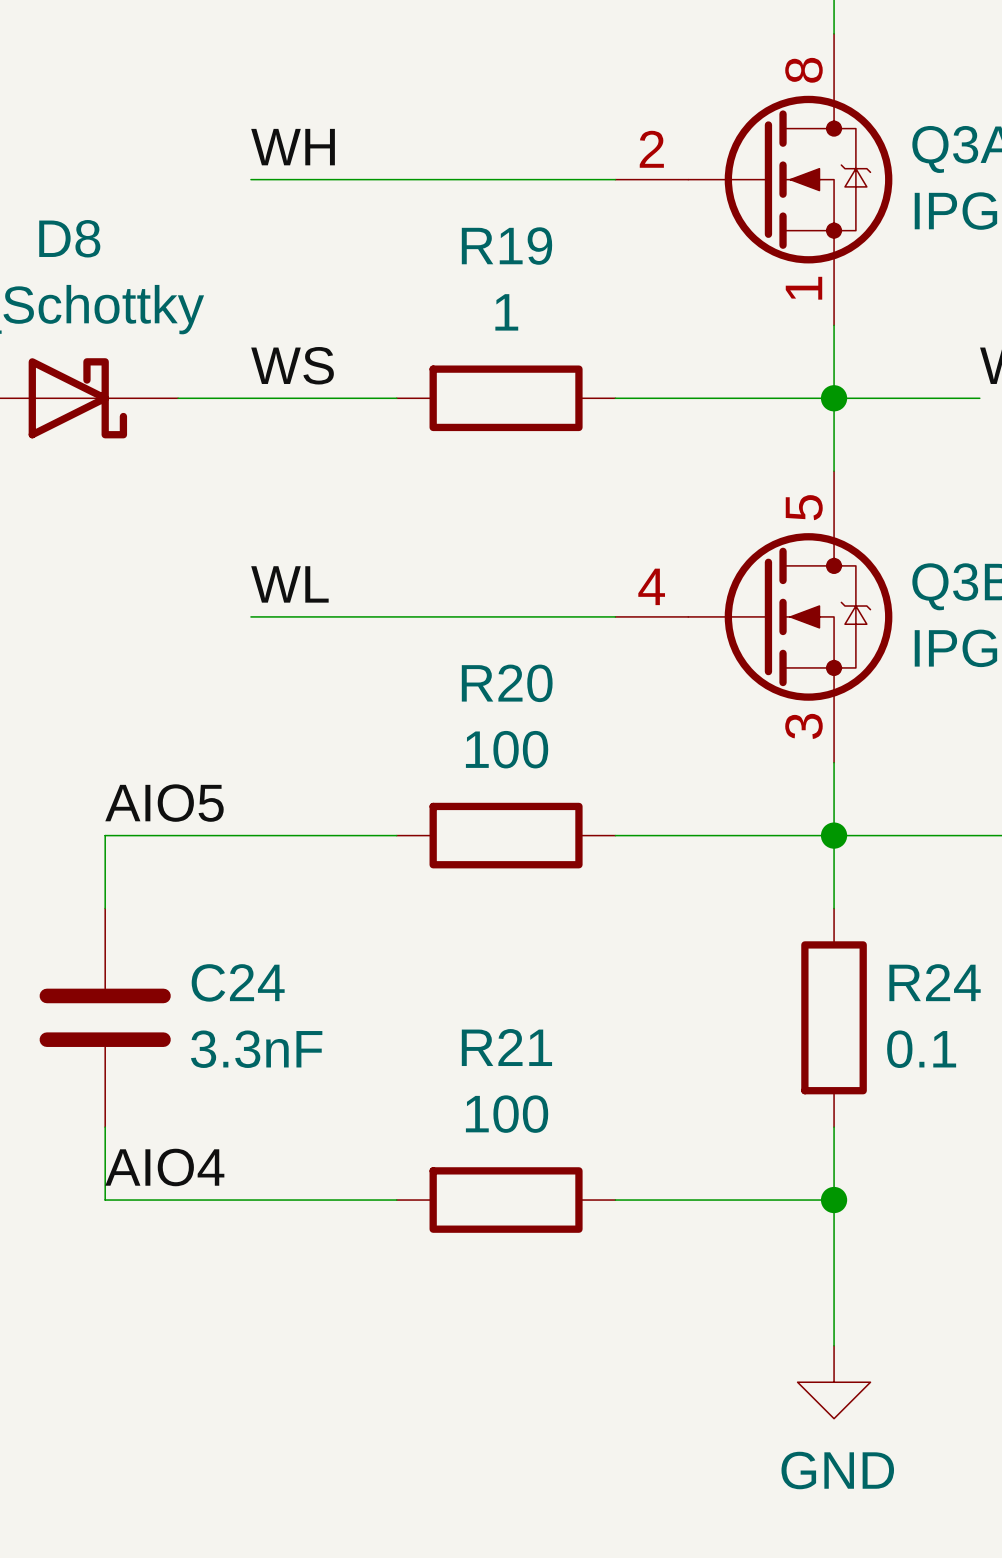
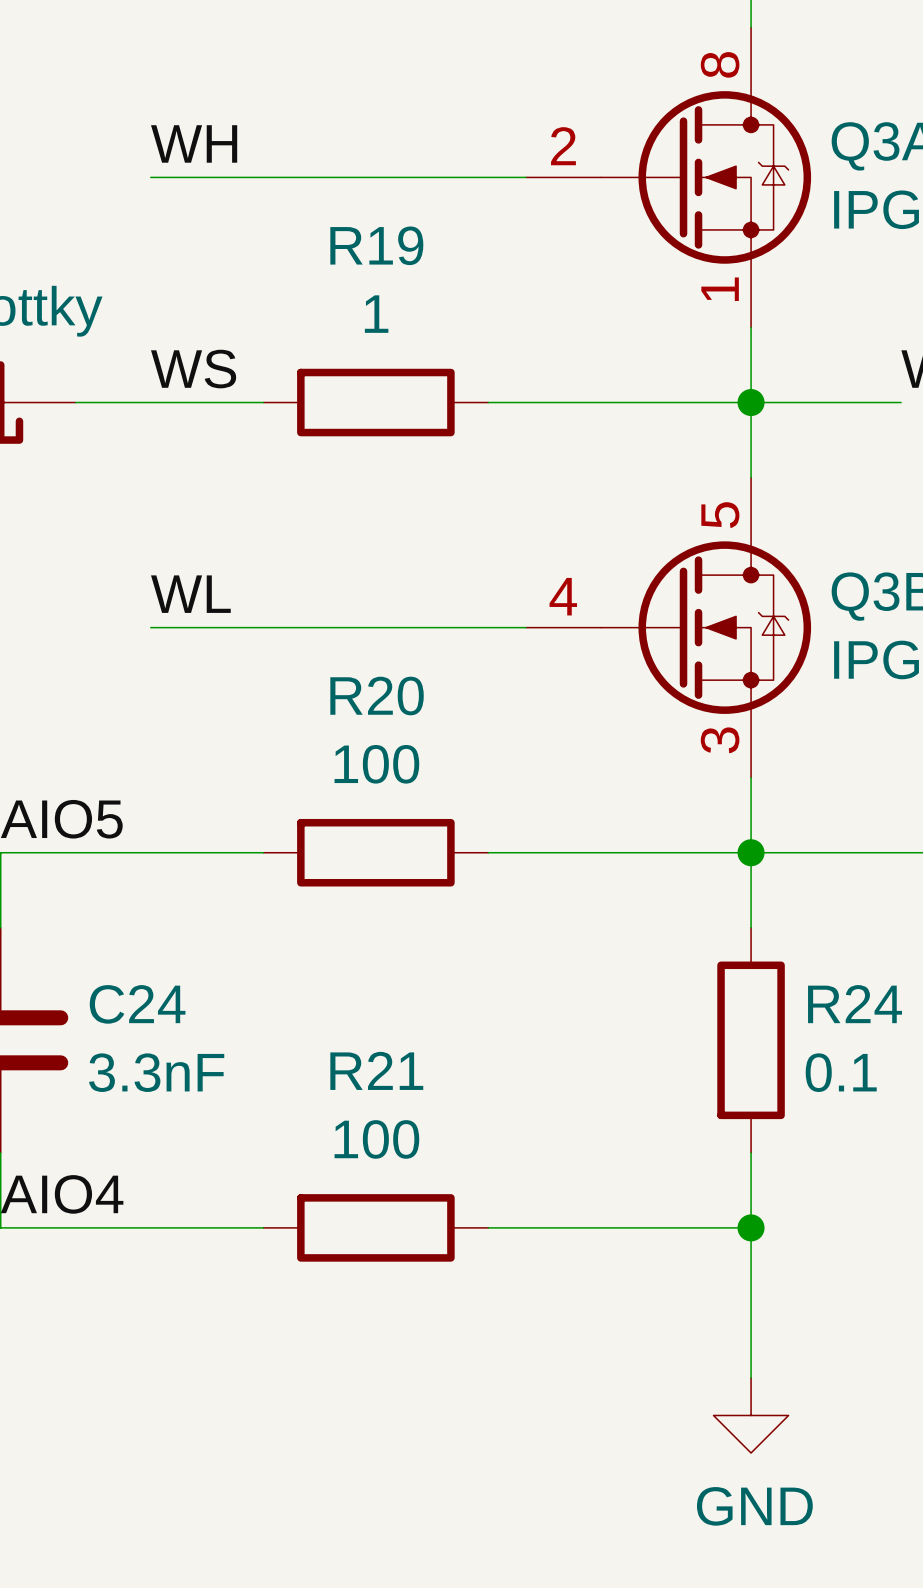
R19 position: (506, 398) -> (375, 402)
R20 position: (506, 835) -> (375, 852)
R21 position: (506, 1200) -> (375, 1227)

